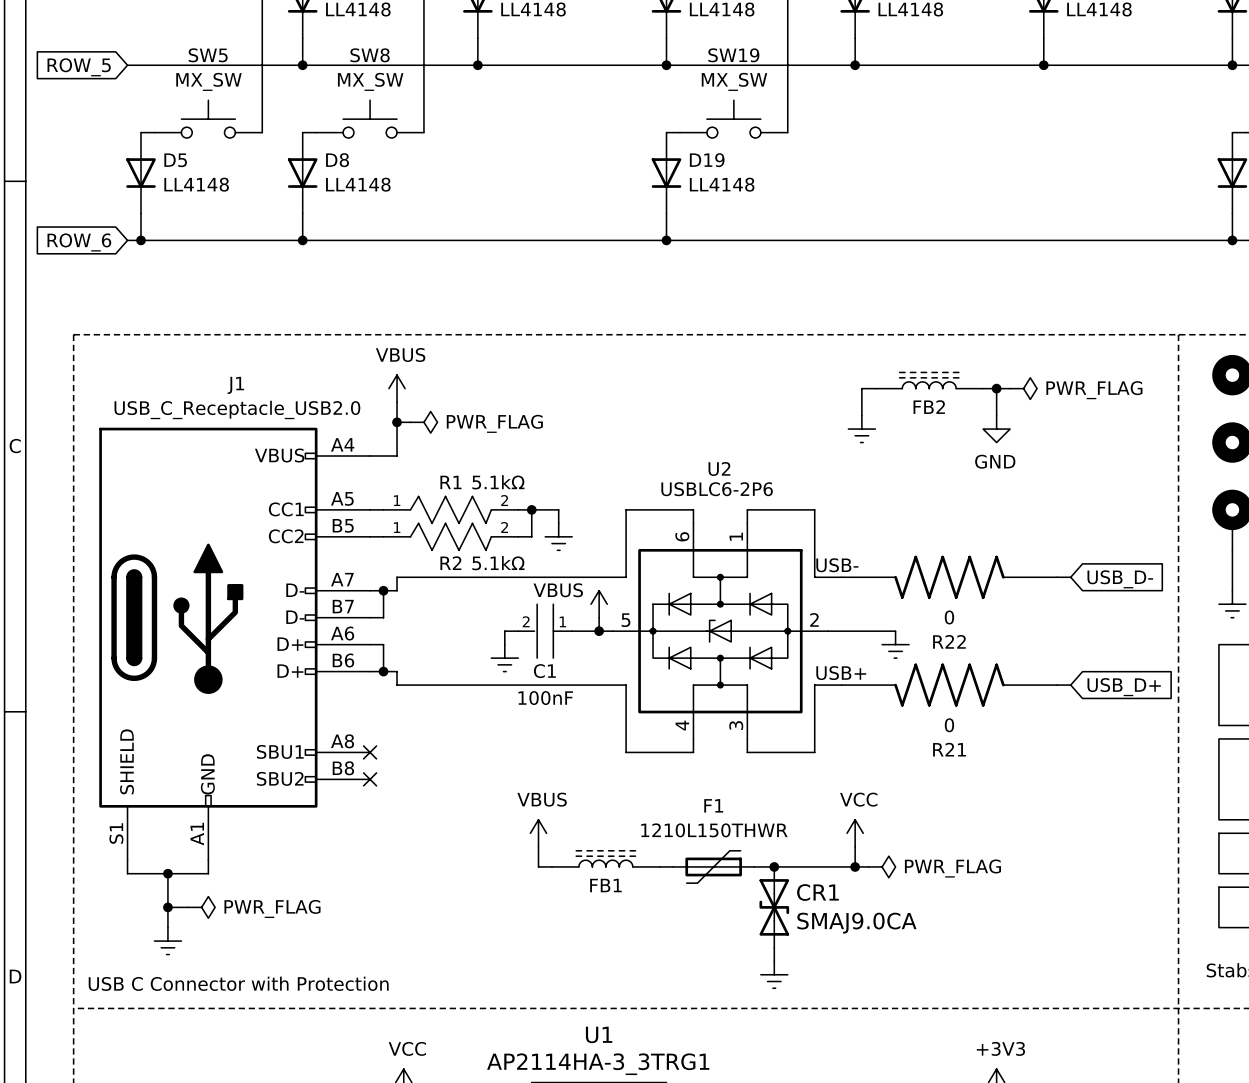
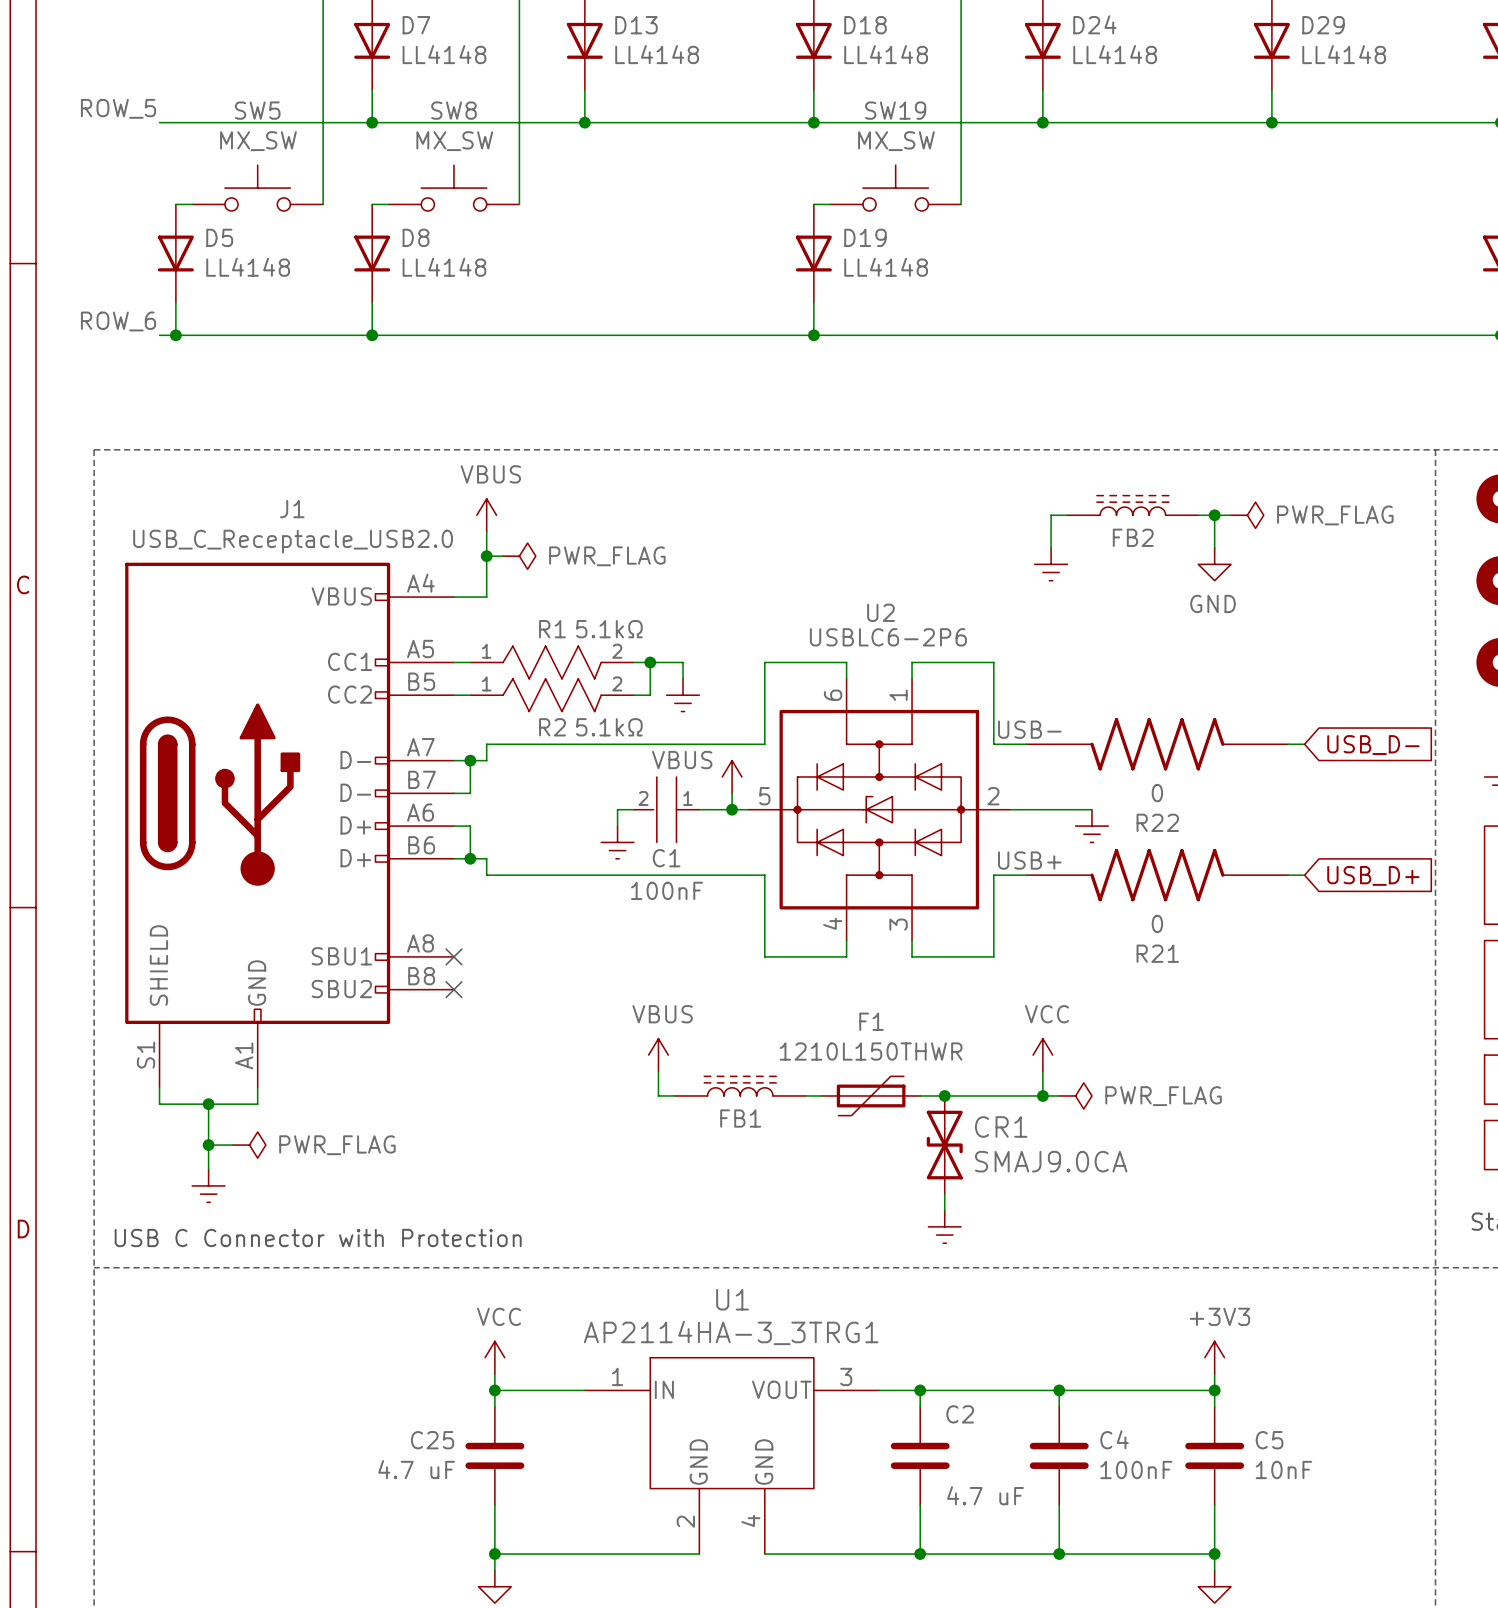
label: none -> ROW_5 (118, 108)
global label: ROW_5 (79, 67) -> none
label: none -> ROW_6 (118, 321)
global label: ROW_6 (79, 242) -> none

